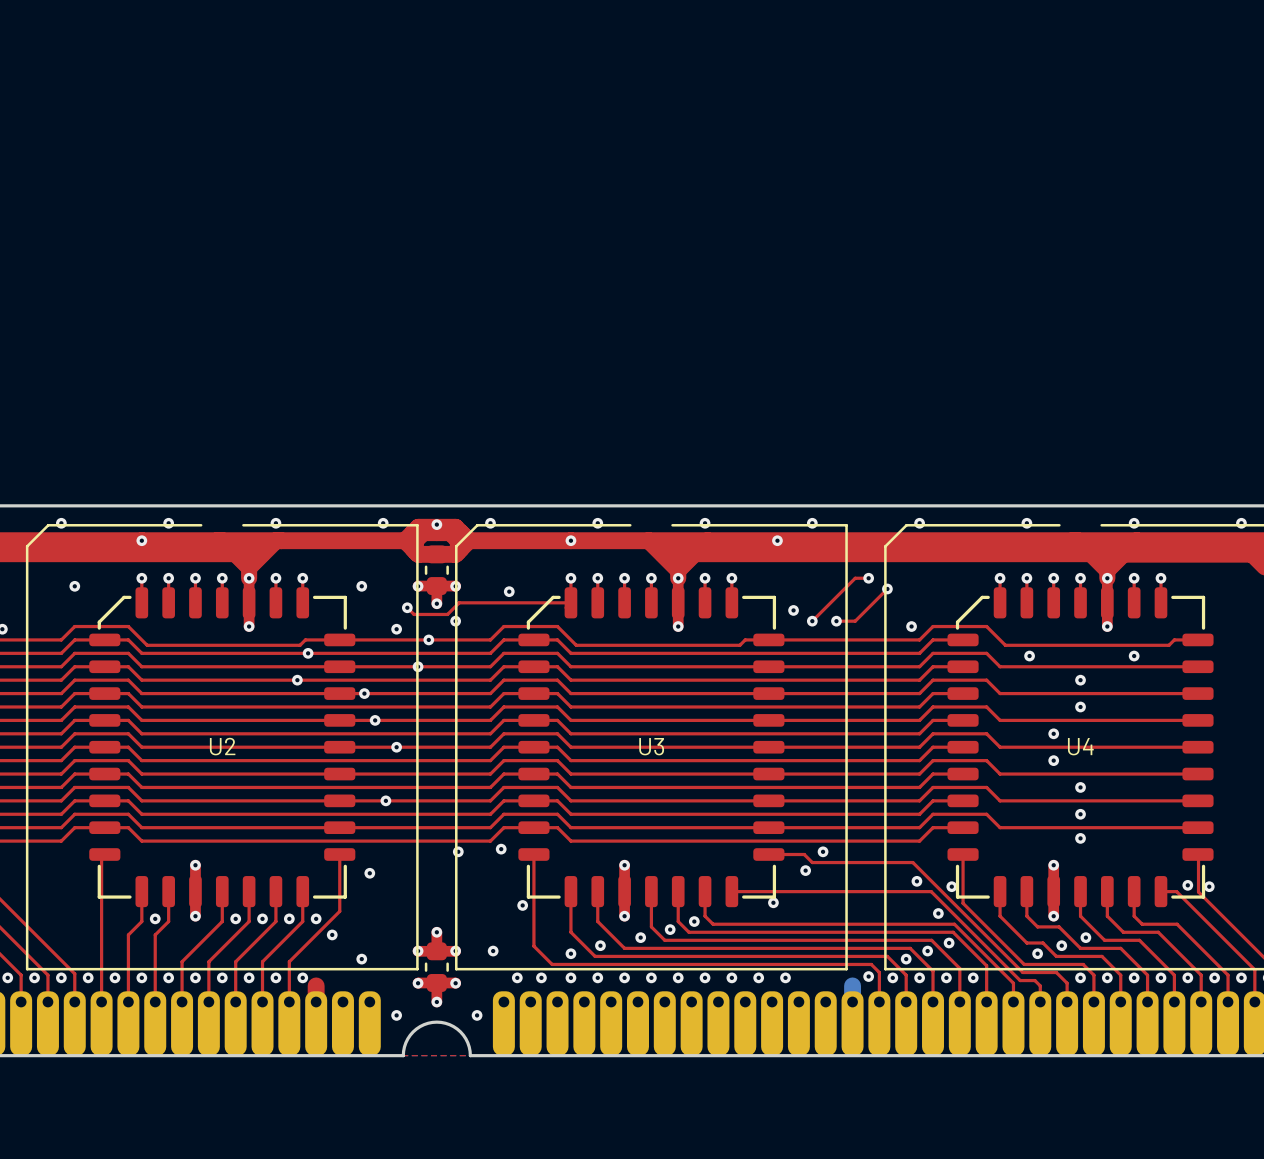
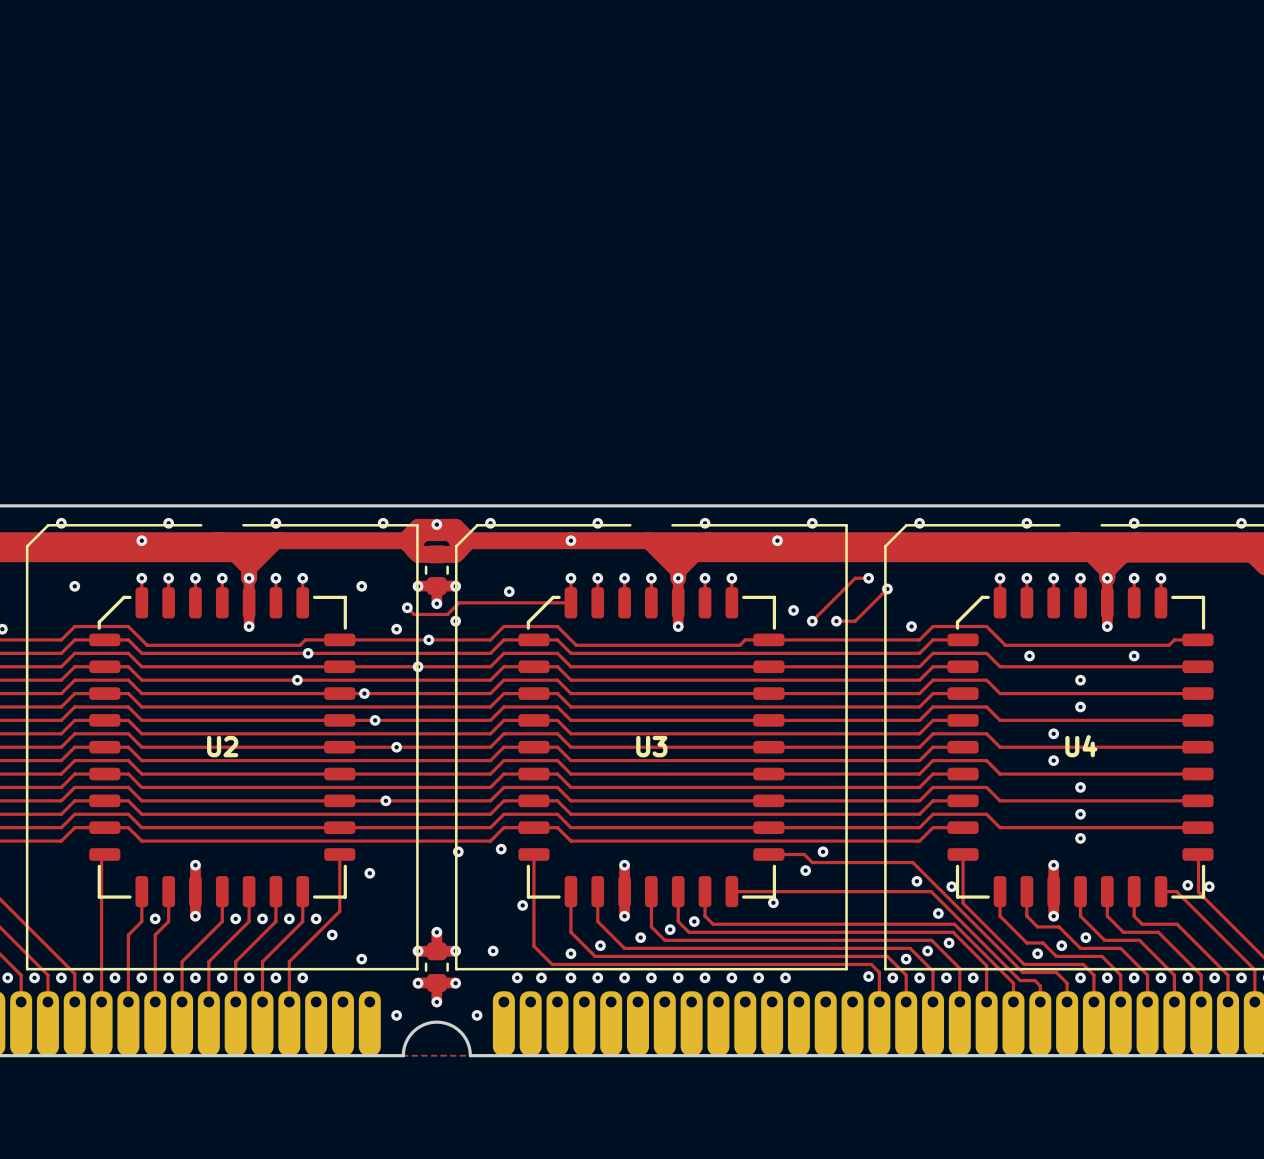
top track: (316, 985) (316, 1002) -> none
bottom track: (852, 985) (852, 1002) -> none

